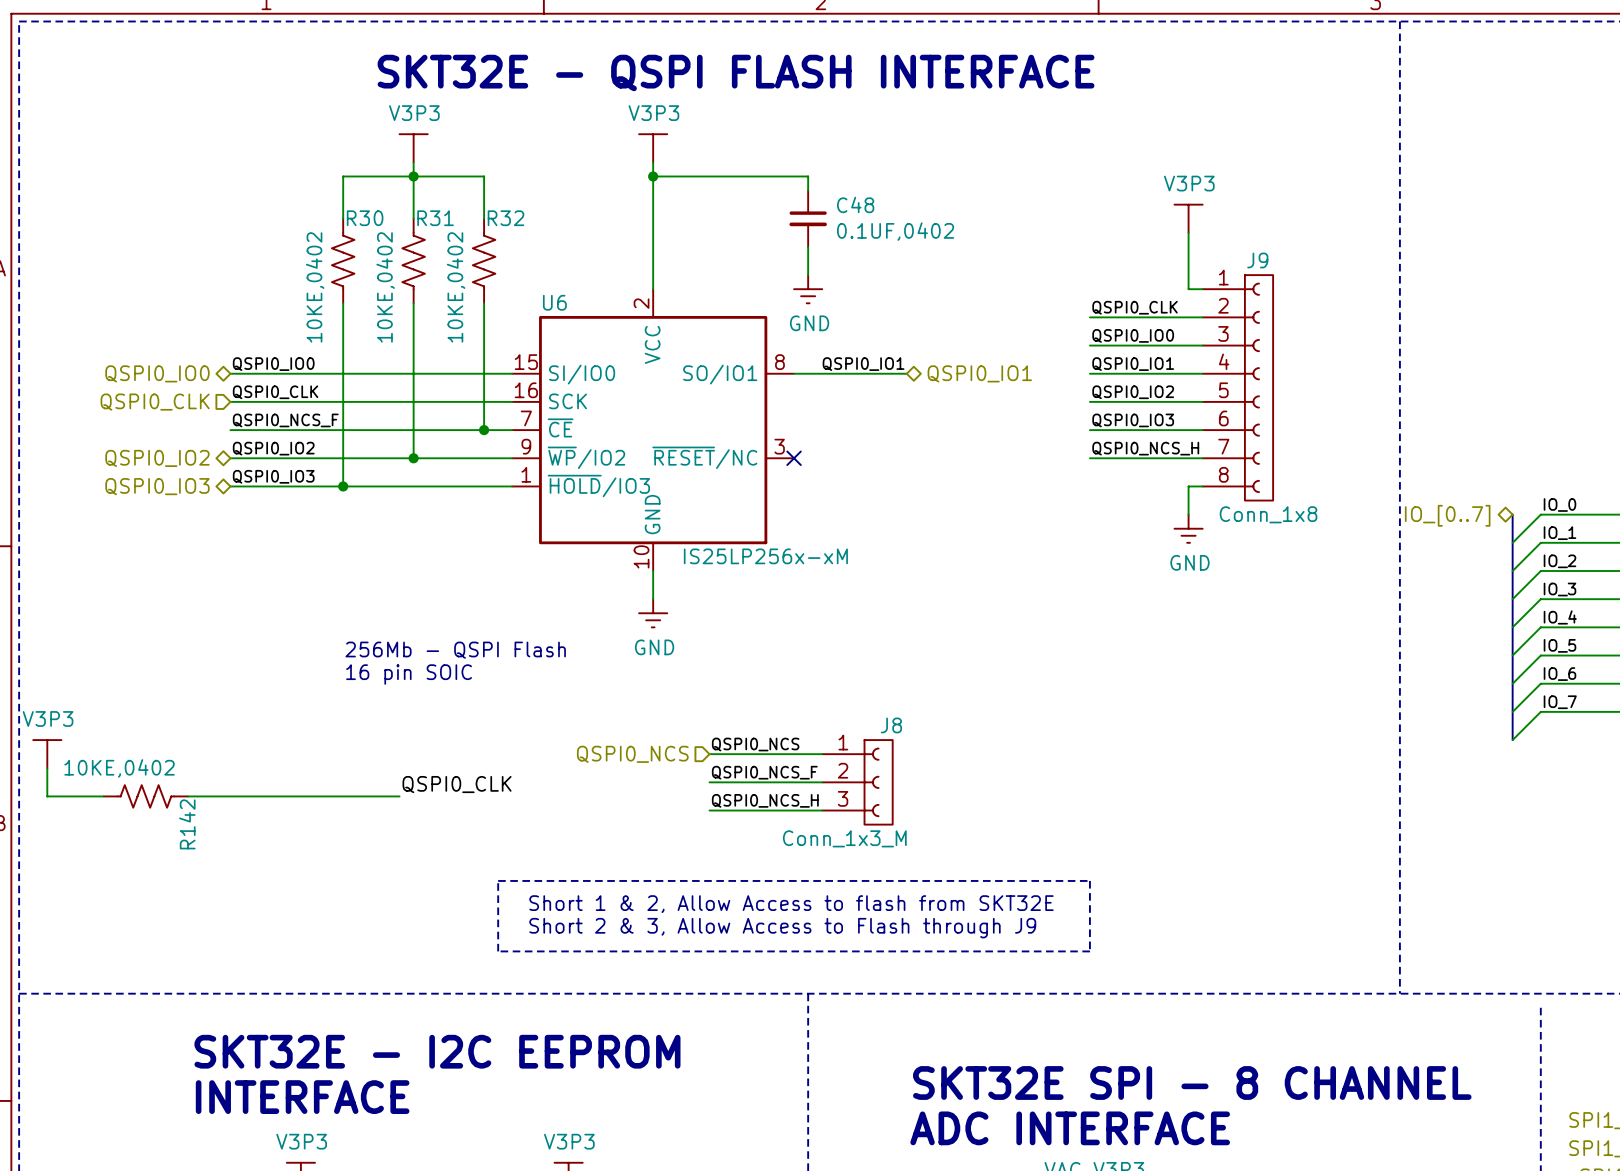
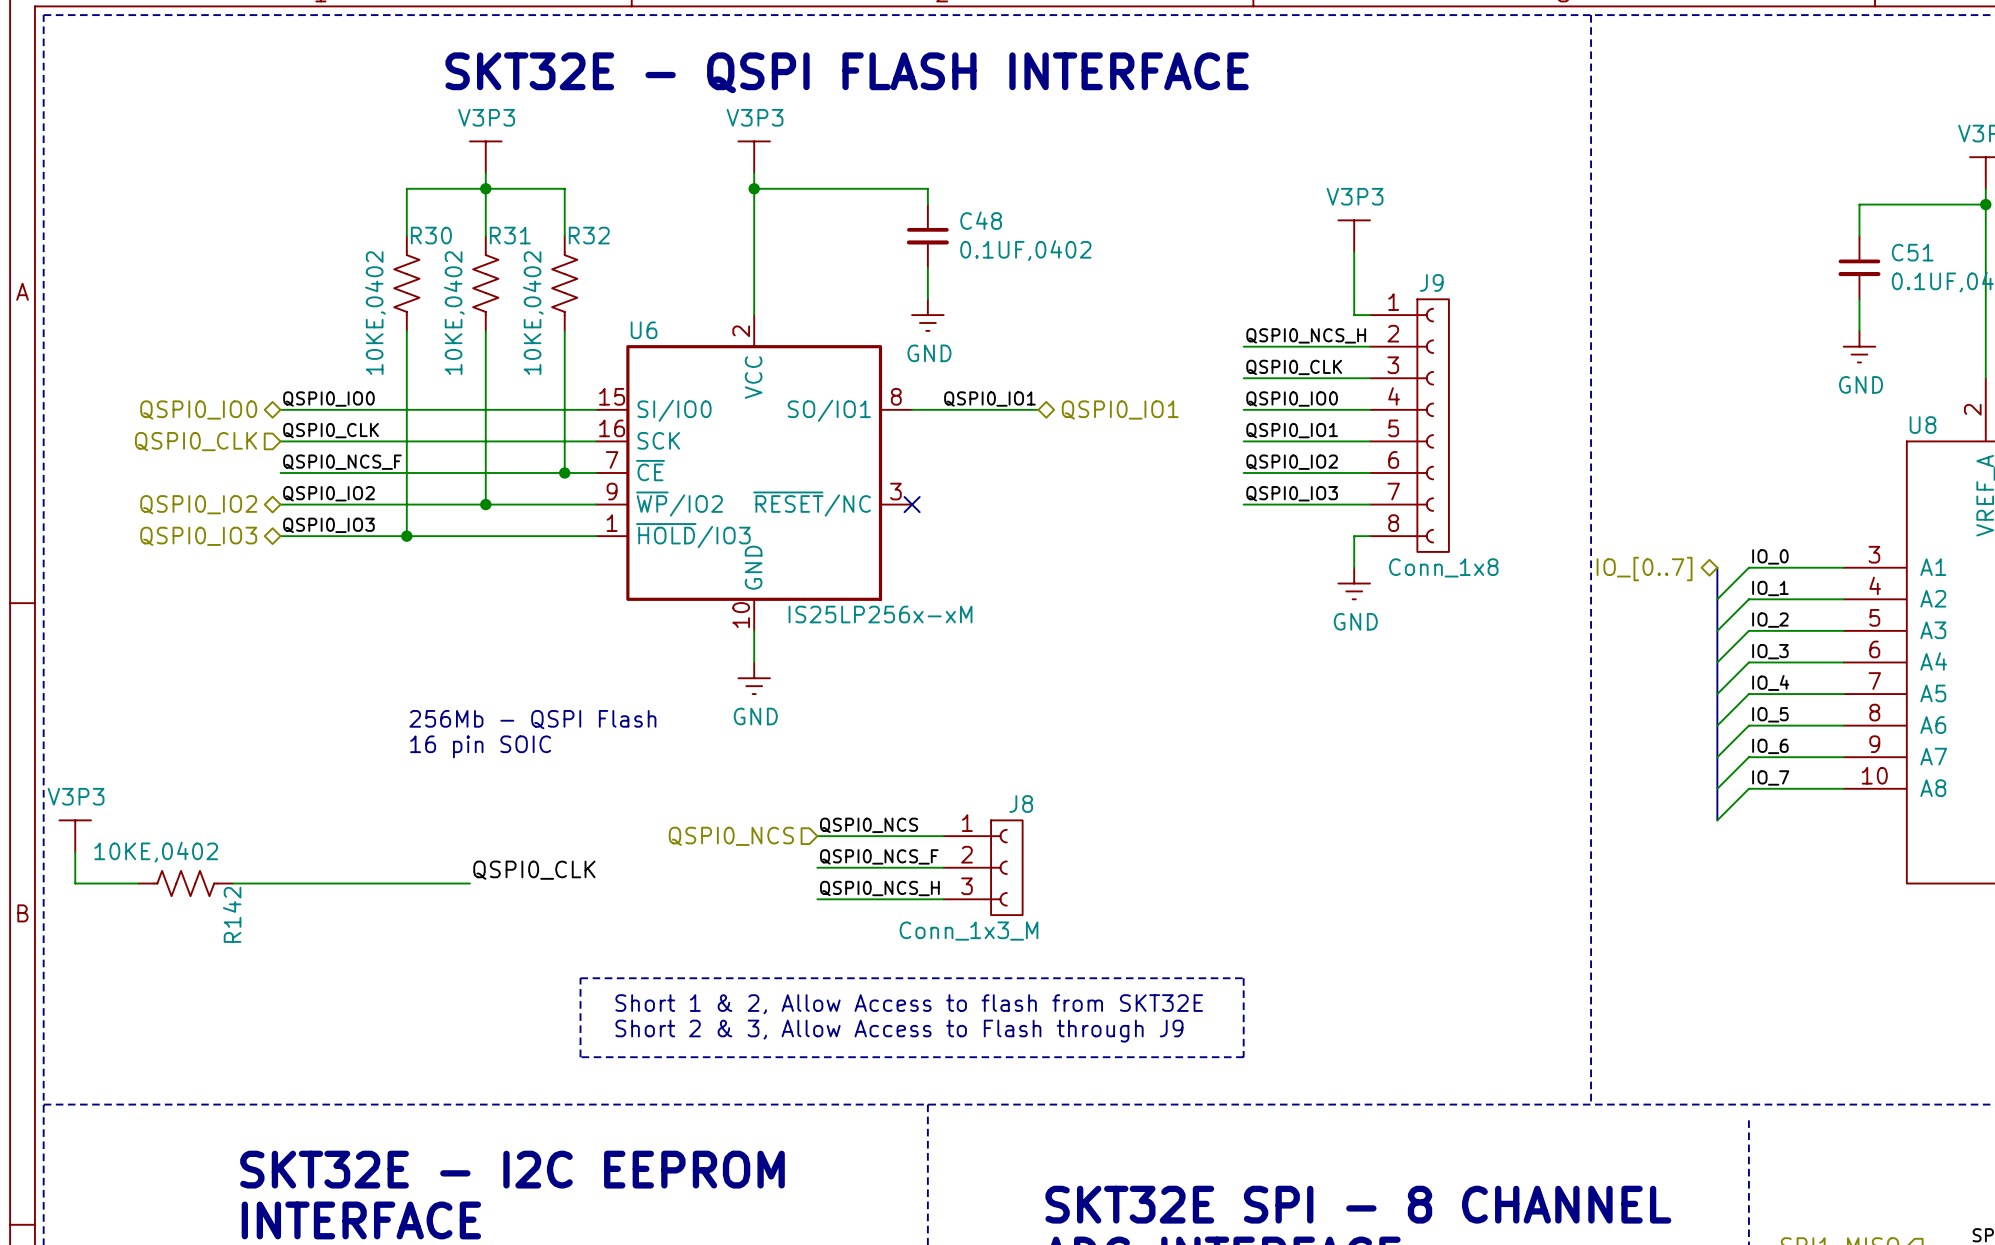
label: QSPI0_CLK (1135, 307) -> QSPI0_NCS_H (1306, 335)
label: QSPI0_IO0 (1133, 335) -> QSPI0_CLK (1294, 367)
label: QSPI0_IO1 (1133, 364) -> QSPI0_IO0 (1292, 399)
label: QSPI0_IO2 (1133, 392) -> QSPI0_IO1 (1292, 430)
label: QSPI0_IO3 (1133, 420) -> QSPI0_IO2 (1292, 462)
label: QSPI0_NCS_H (1145, 448) -> QSPI0_IO3 (1292, 493)

